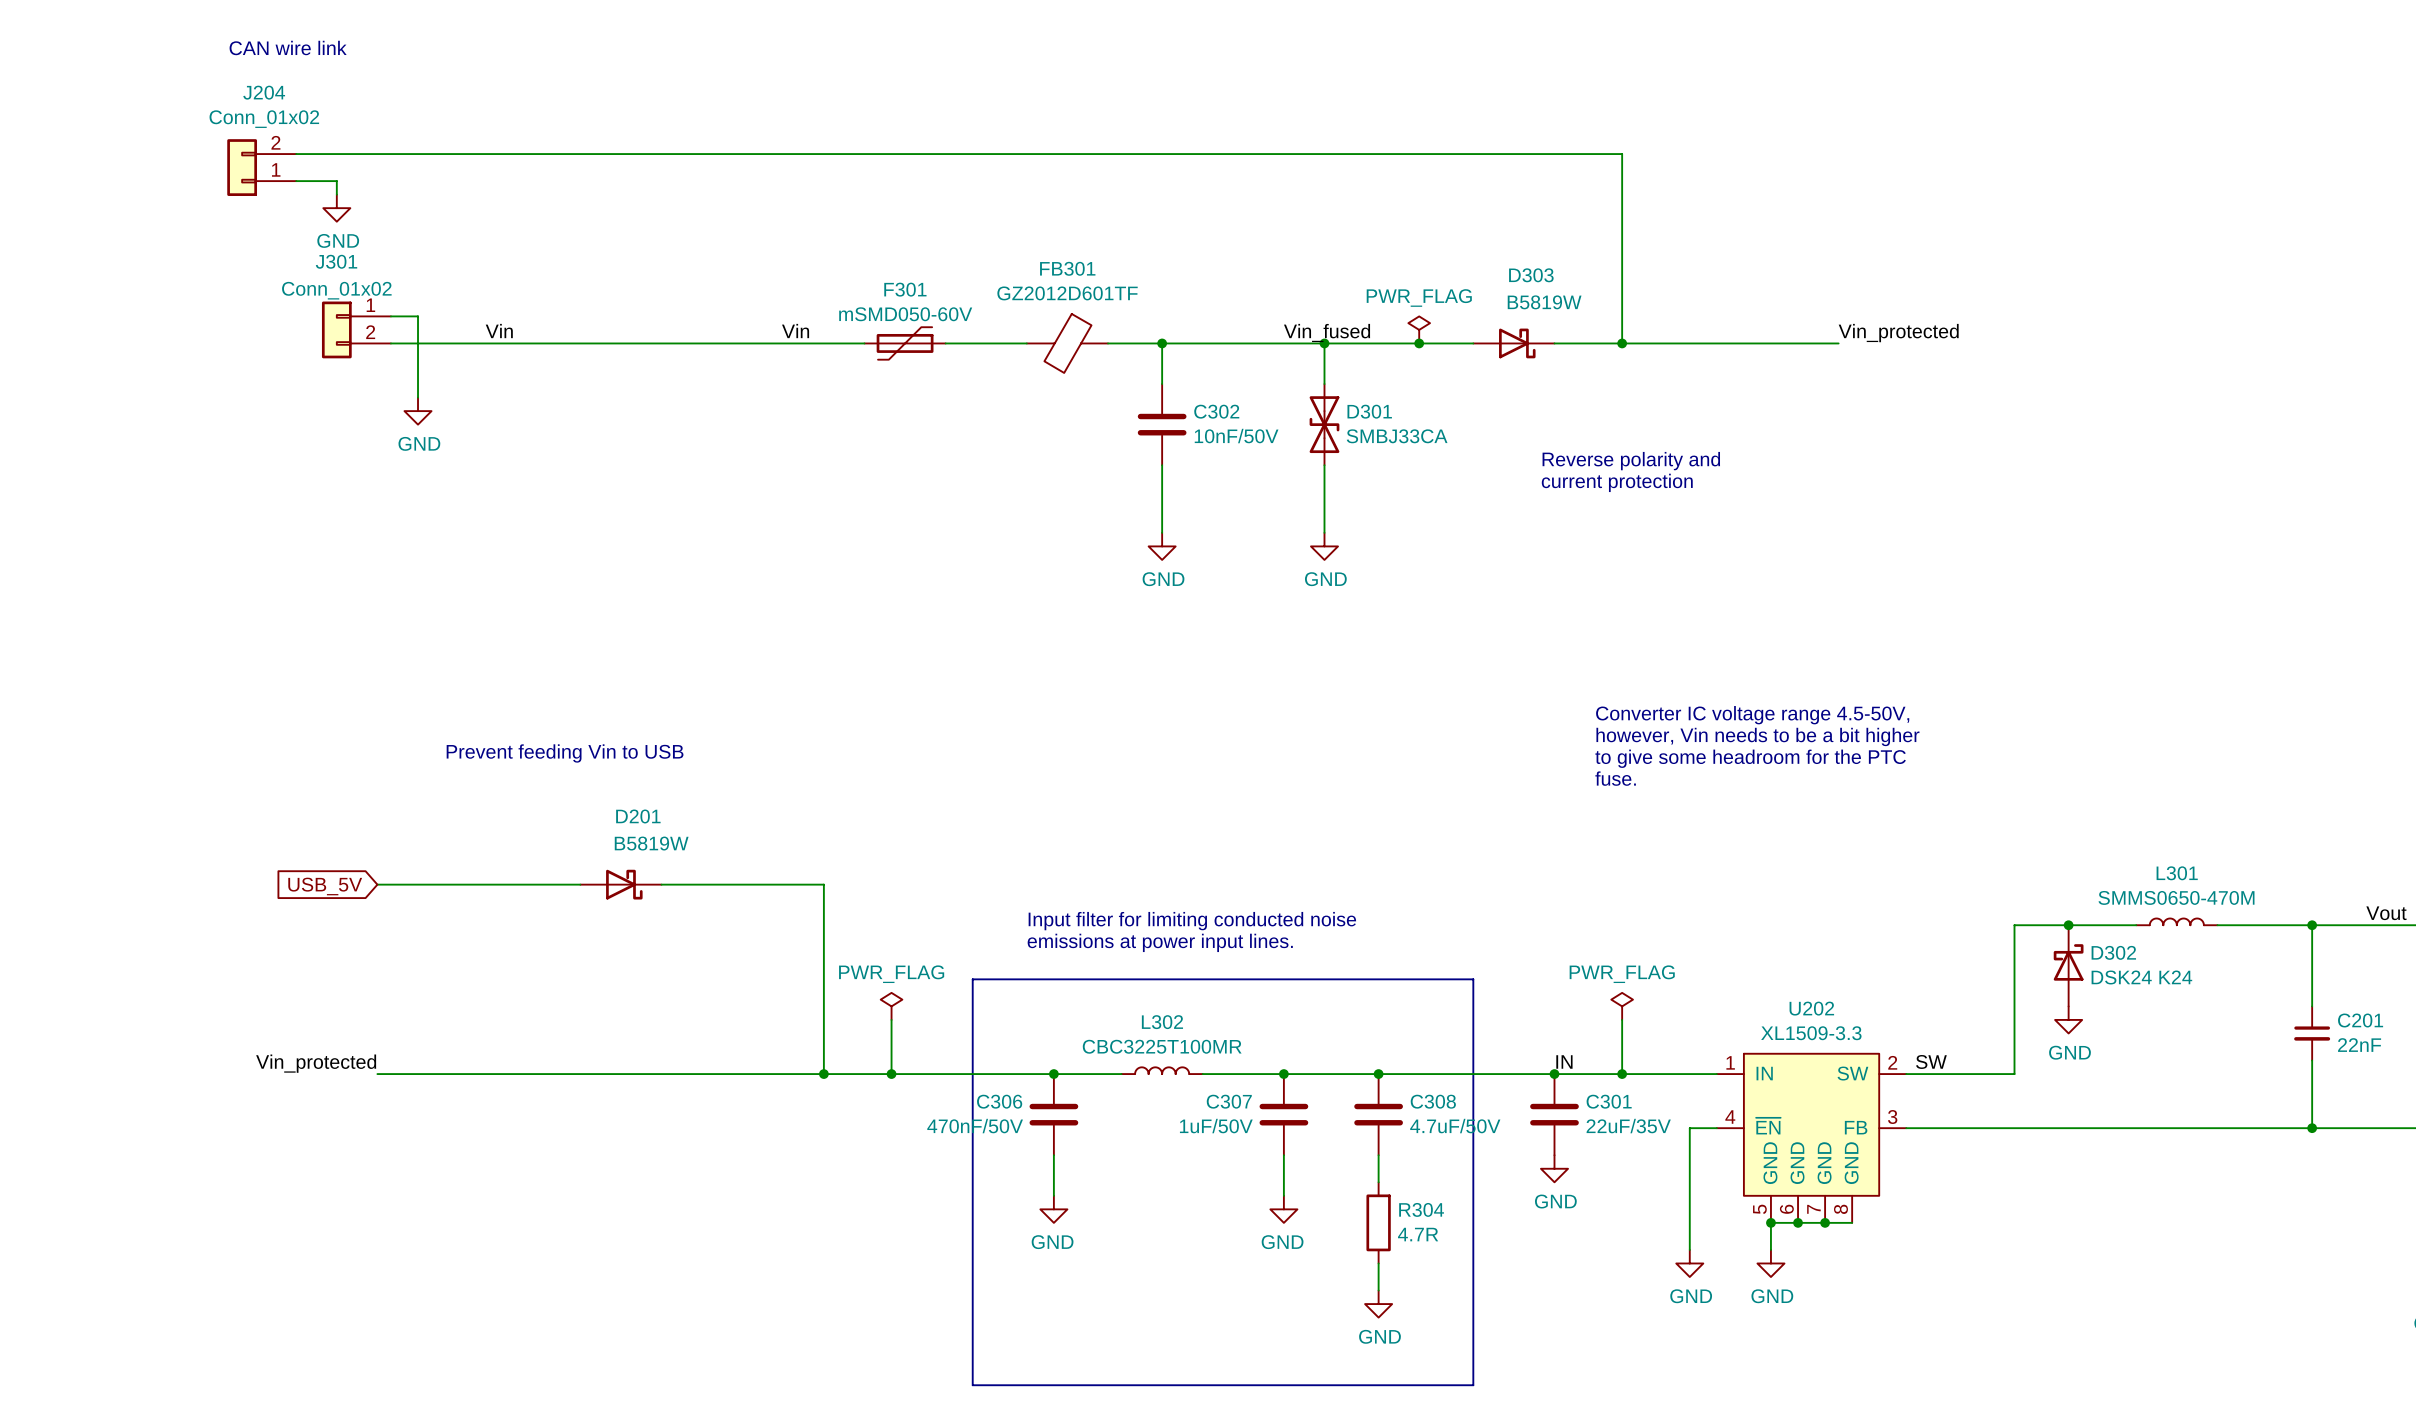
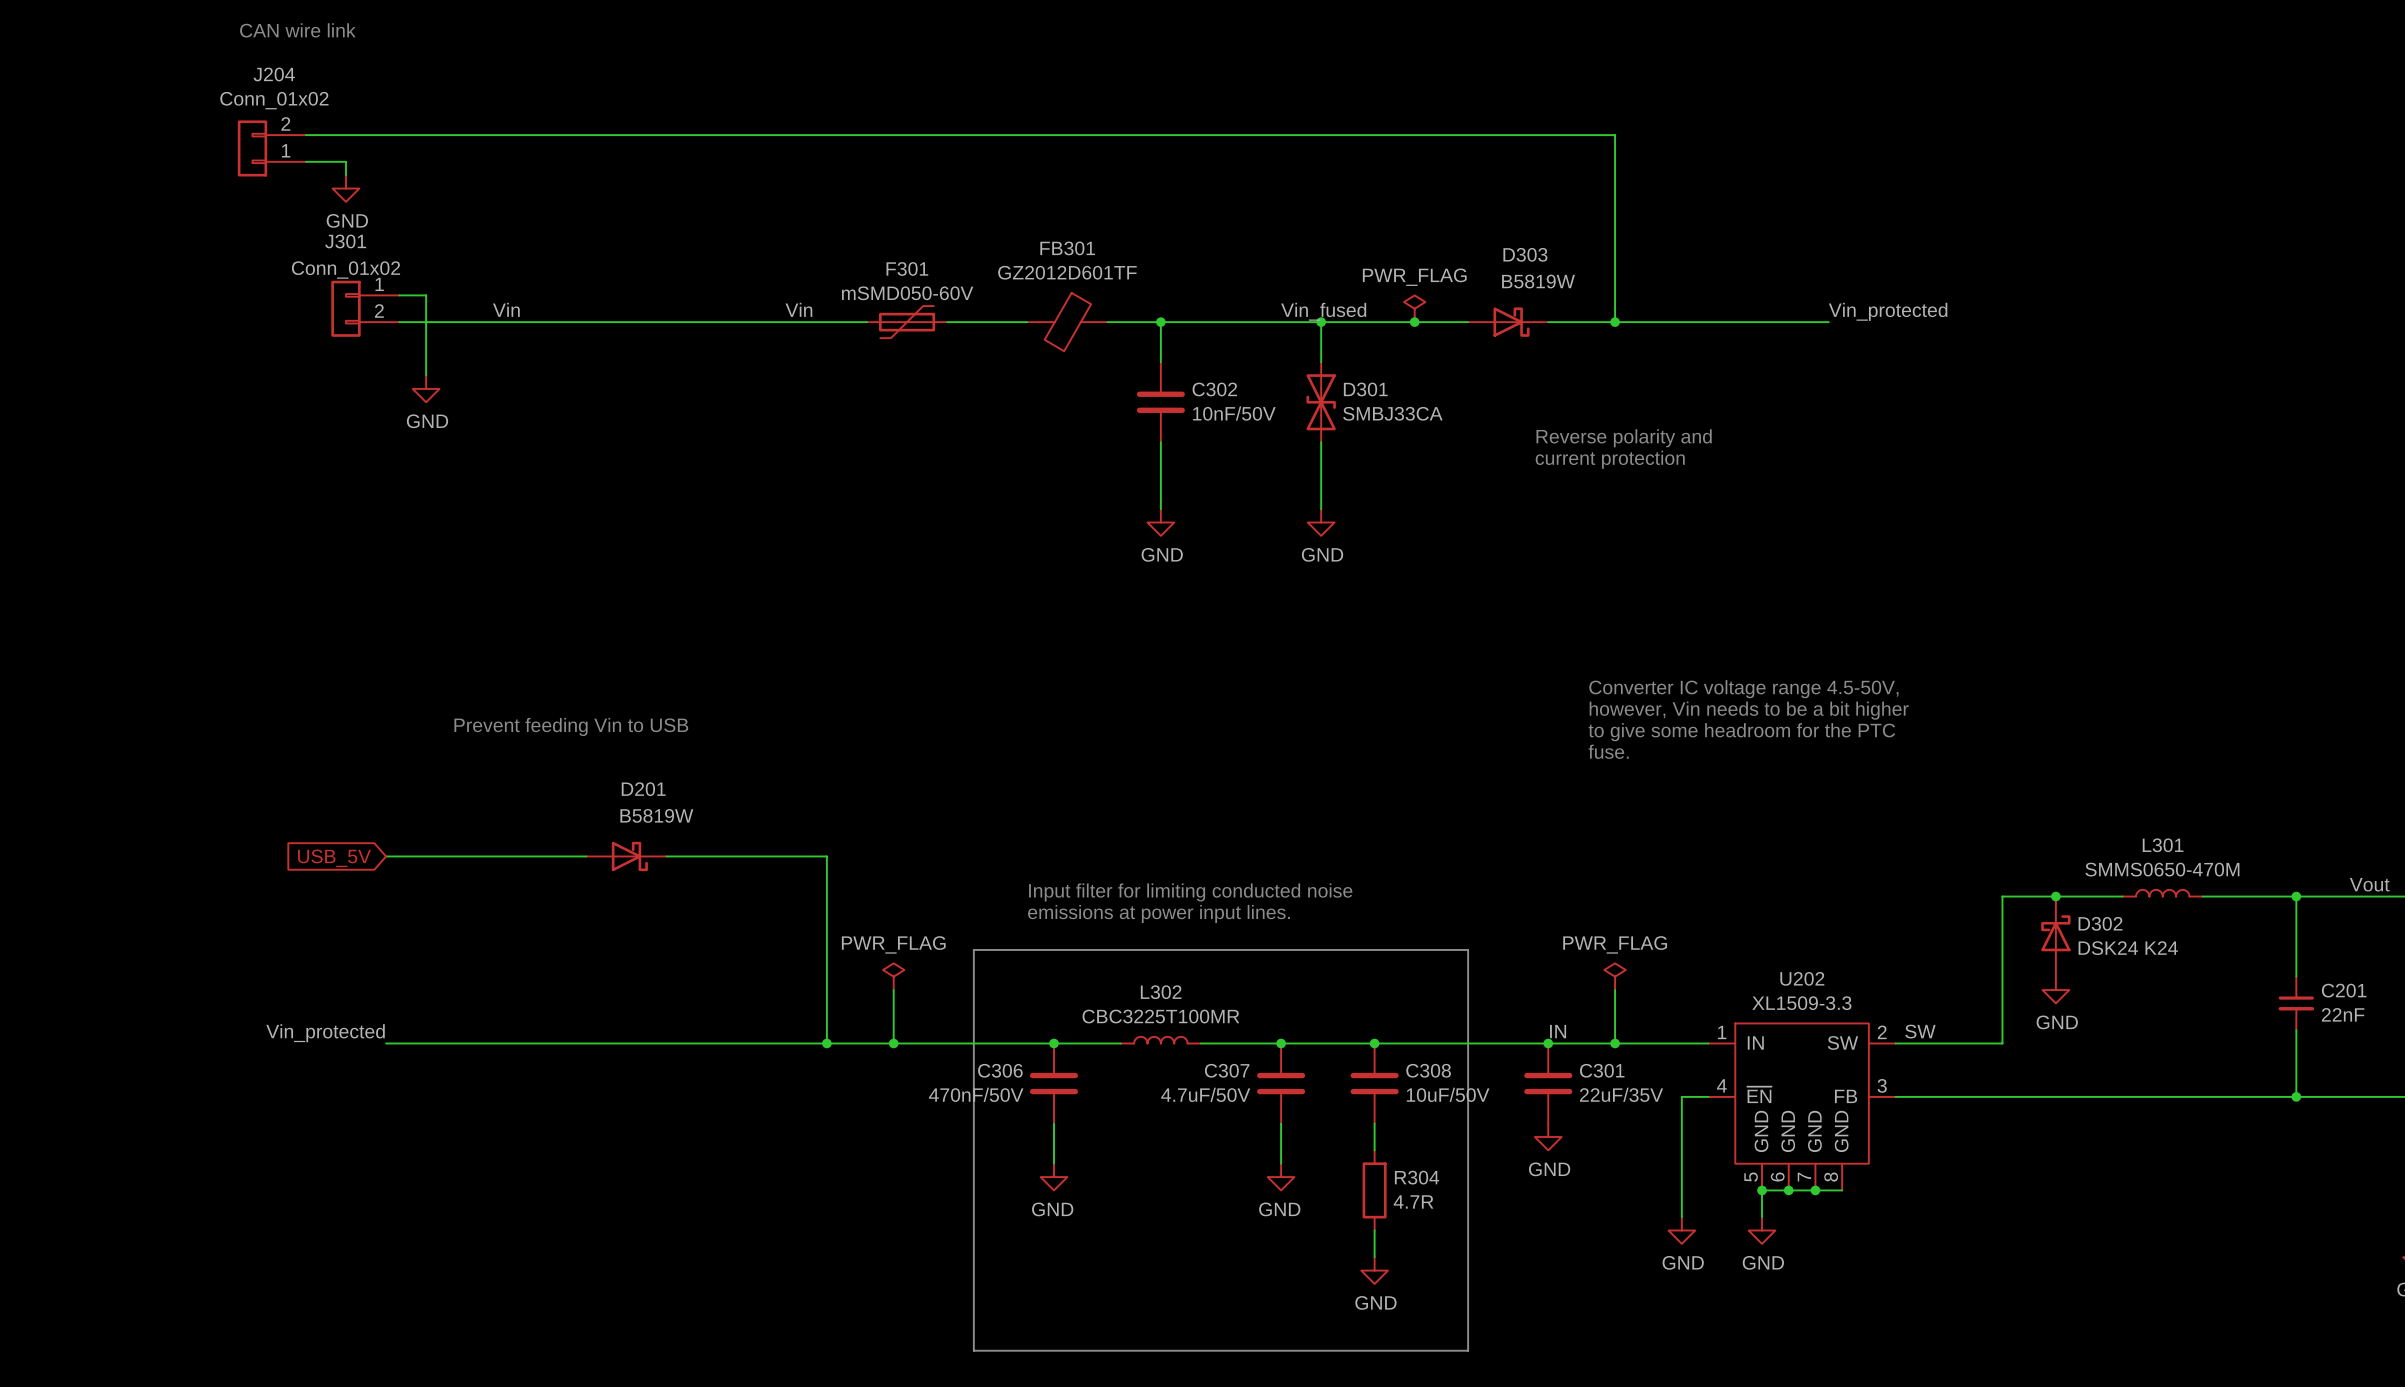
C307 value: 1uF/50V (1216, 1126) -> 4.7uF/50V (1205, 1094)
C308 value: 4.7uF/50V (1455, 1126) -> 10uF/50V (1448, 1094)

